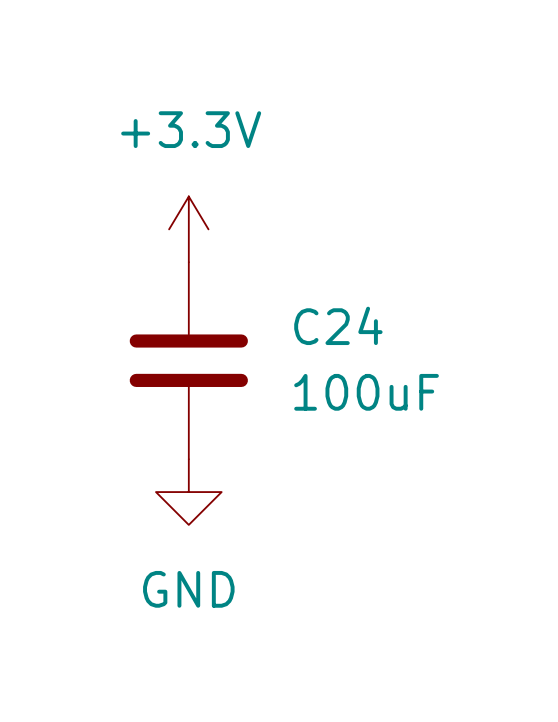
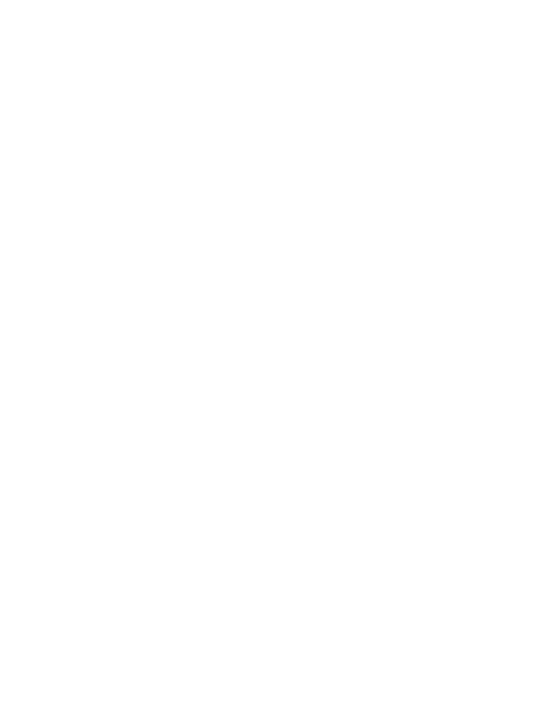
power symbol: +3.3V (188, 229) -> none
C24: 100uF (188, 360) -> none
power symbol: GND (188, 492) -> none

